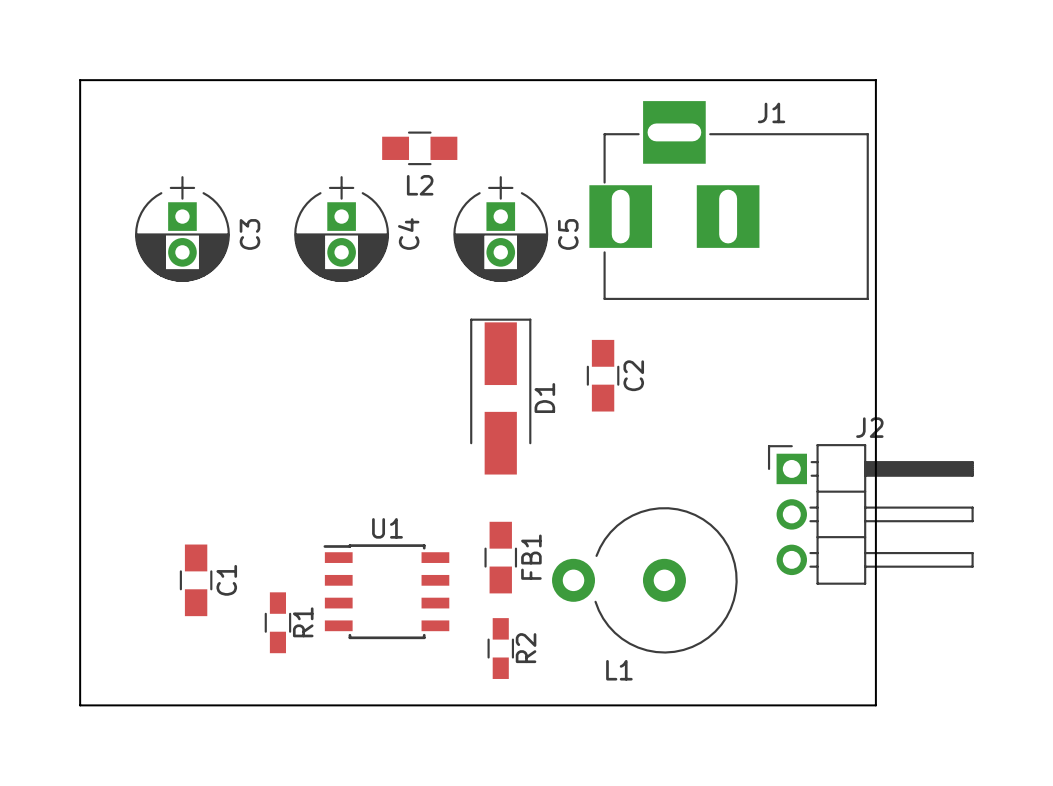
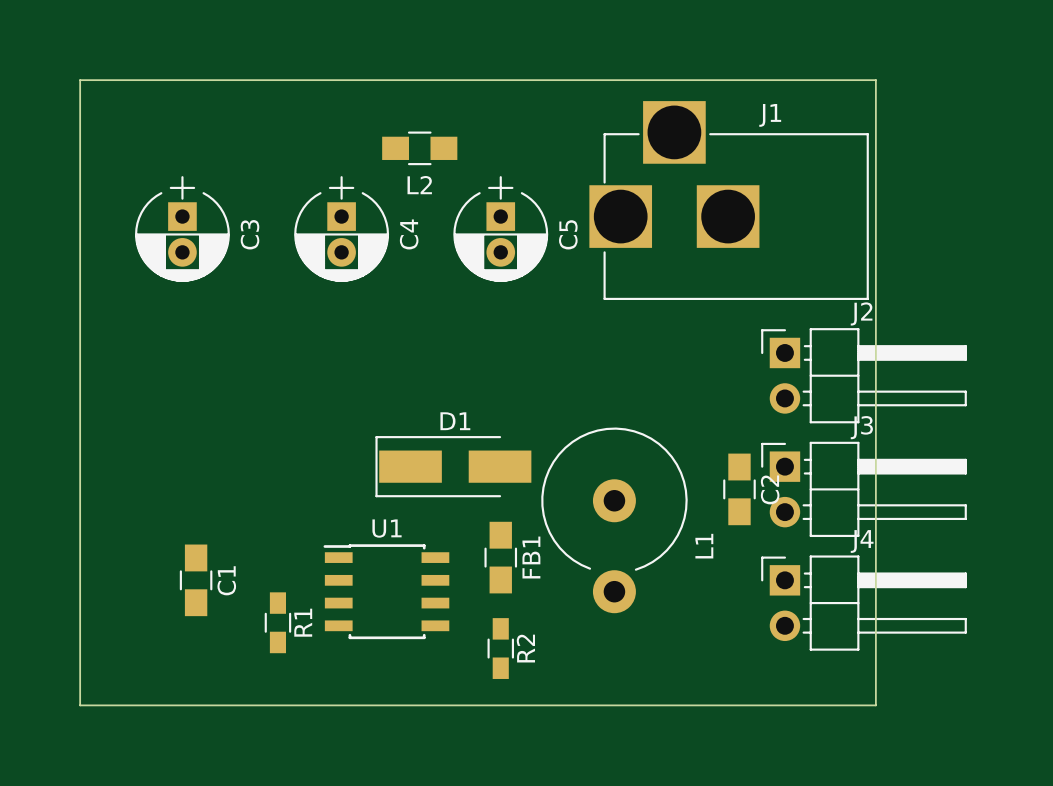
J1 footprint: [589, 101, 869, 300] -> [589, 101, 869, 300]
C2 position: (603, 375) -> (739, 489)
D1 rotation: 0° (500, 396) -> 90° counterclockwise (453, 466)
J2 footprint: [767, 444, 974, 585] -> [761, 328, 967, 424]
J3: none -> (864, 489)
L1 rotation: 0° (644, 580) -> 90° counterclockwise (614, 520)
J4: none -> (864, 603)

